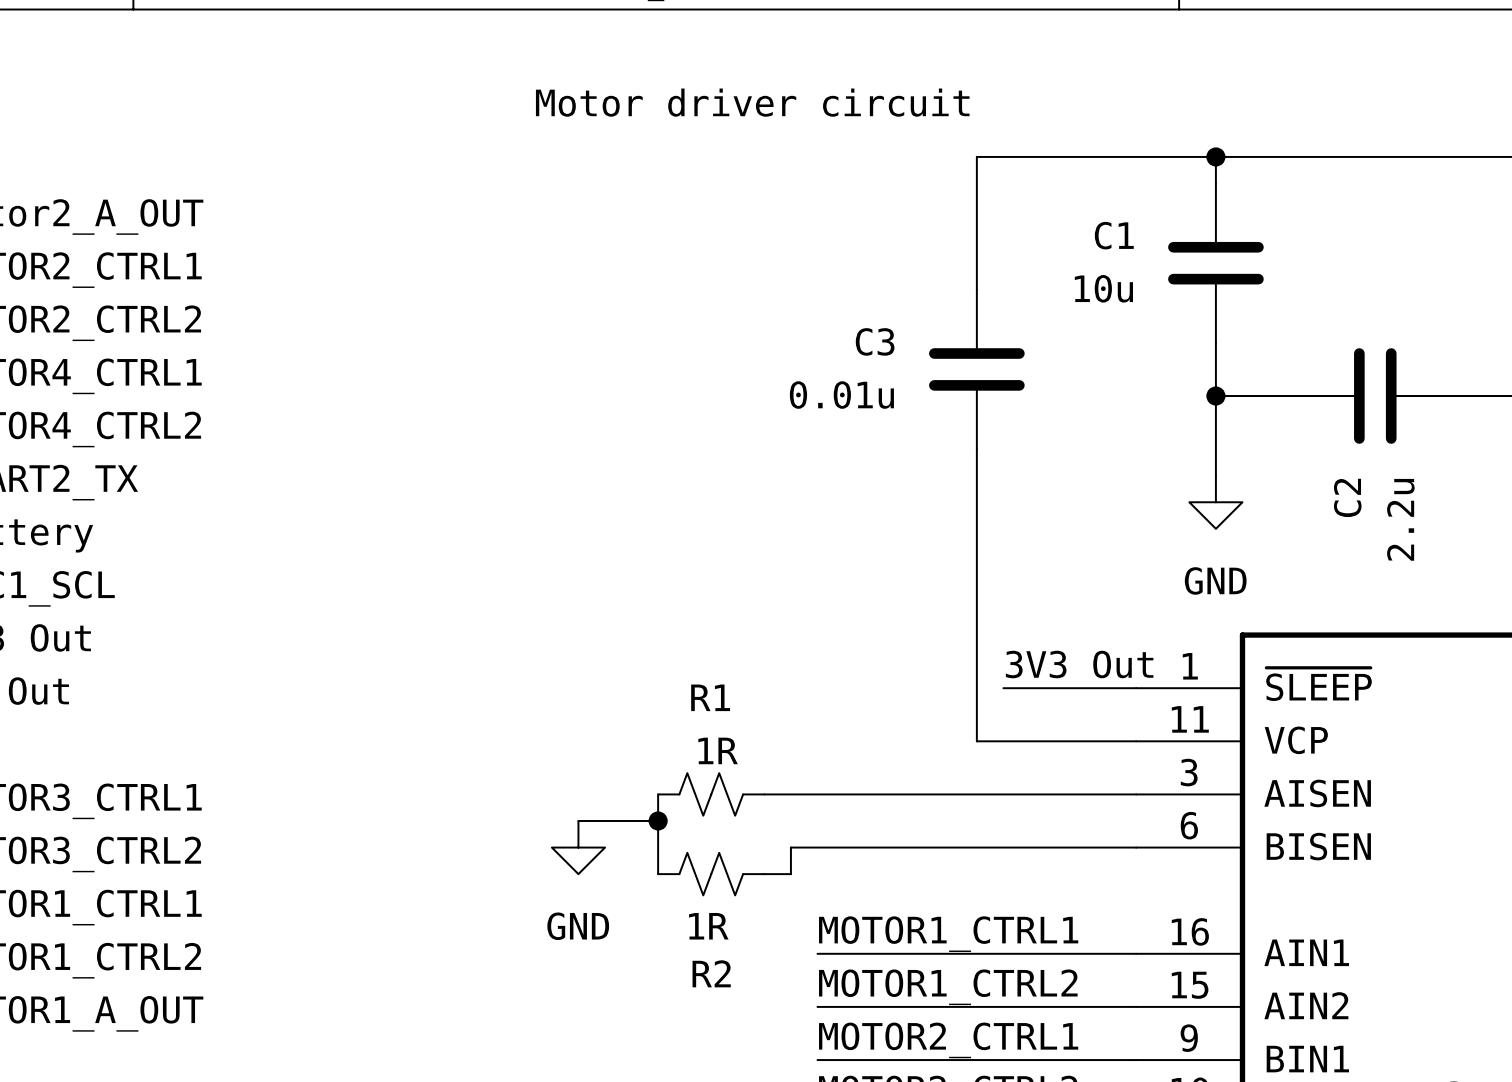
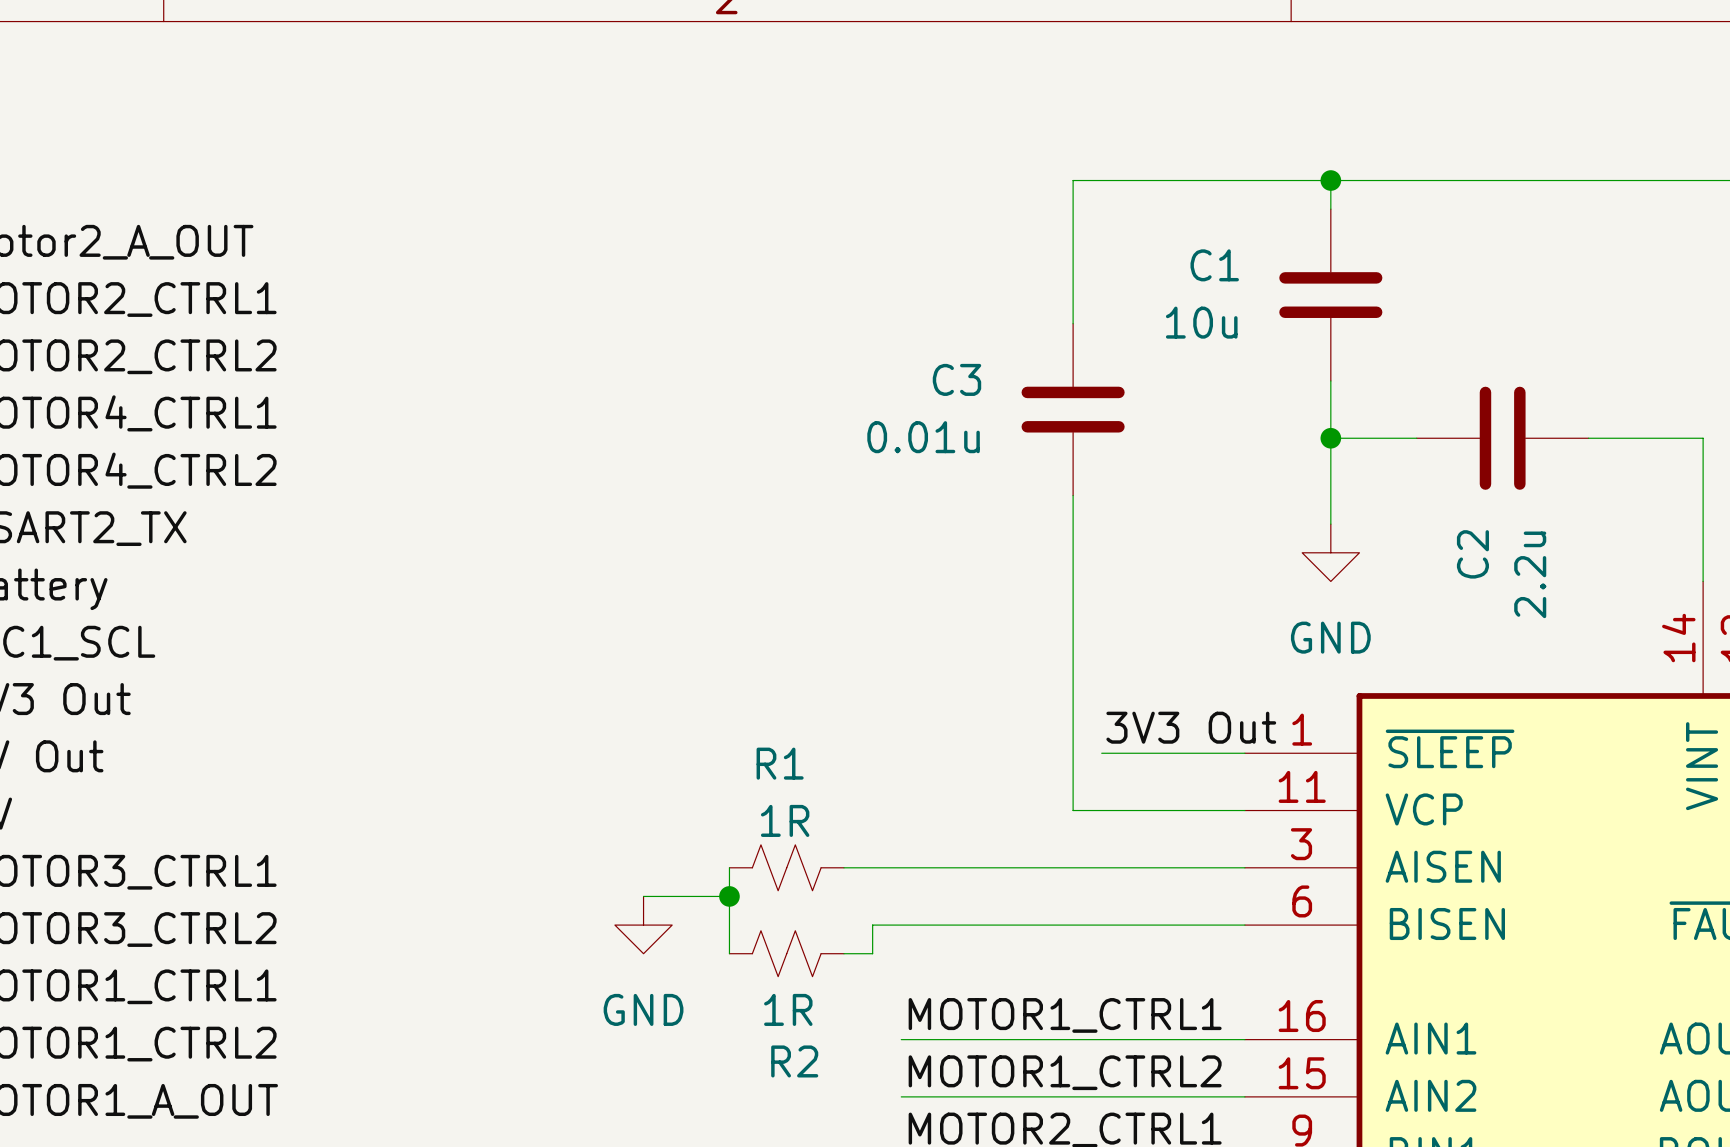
text: Motor driver circuit (752, 102) -> none

